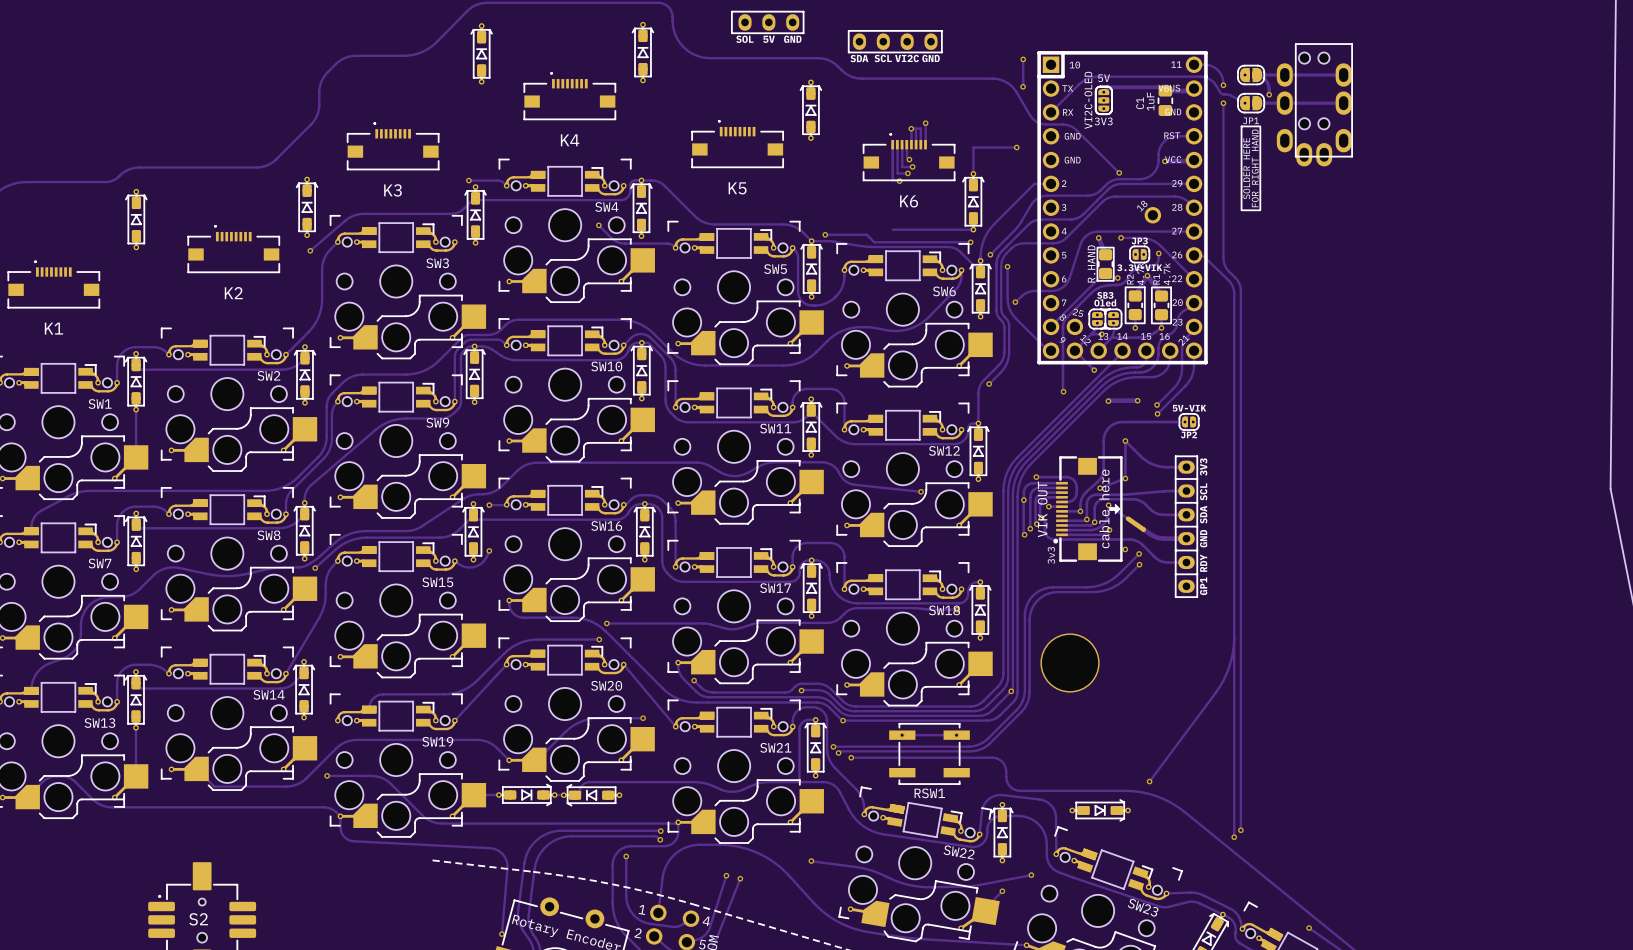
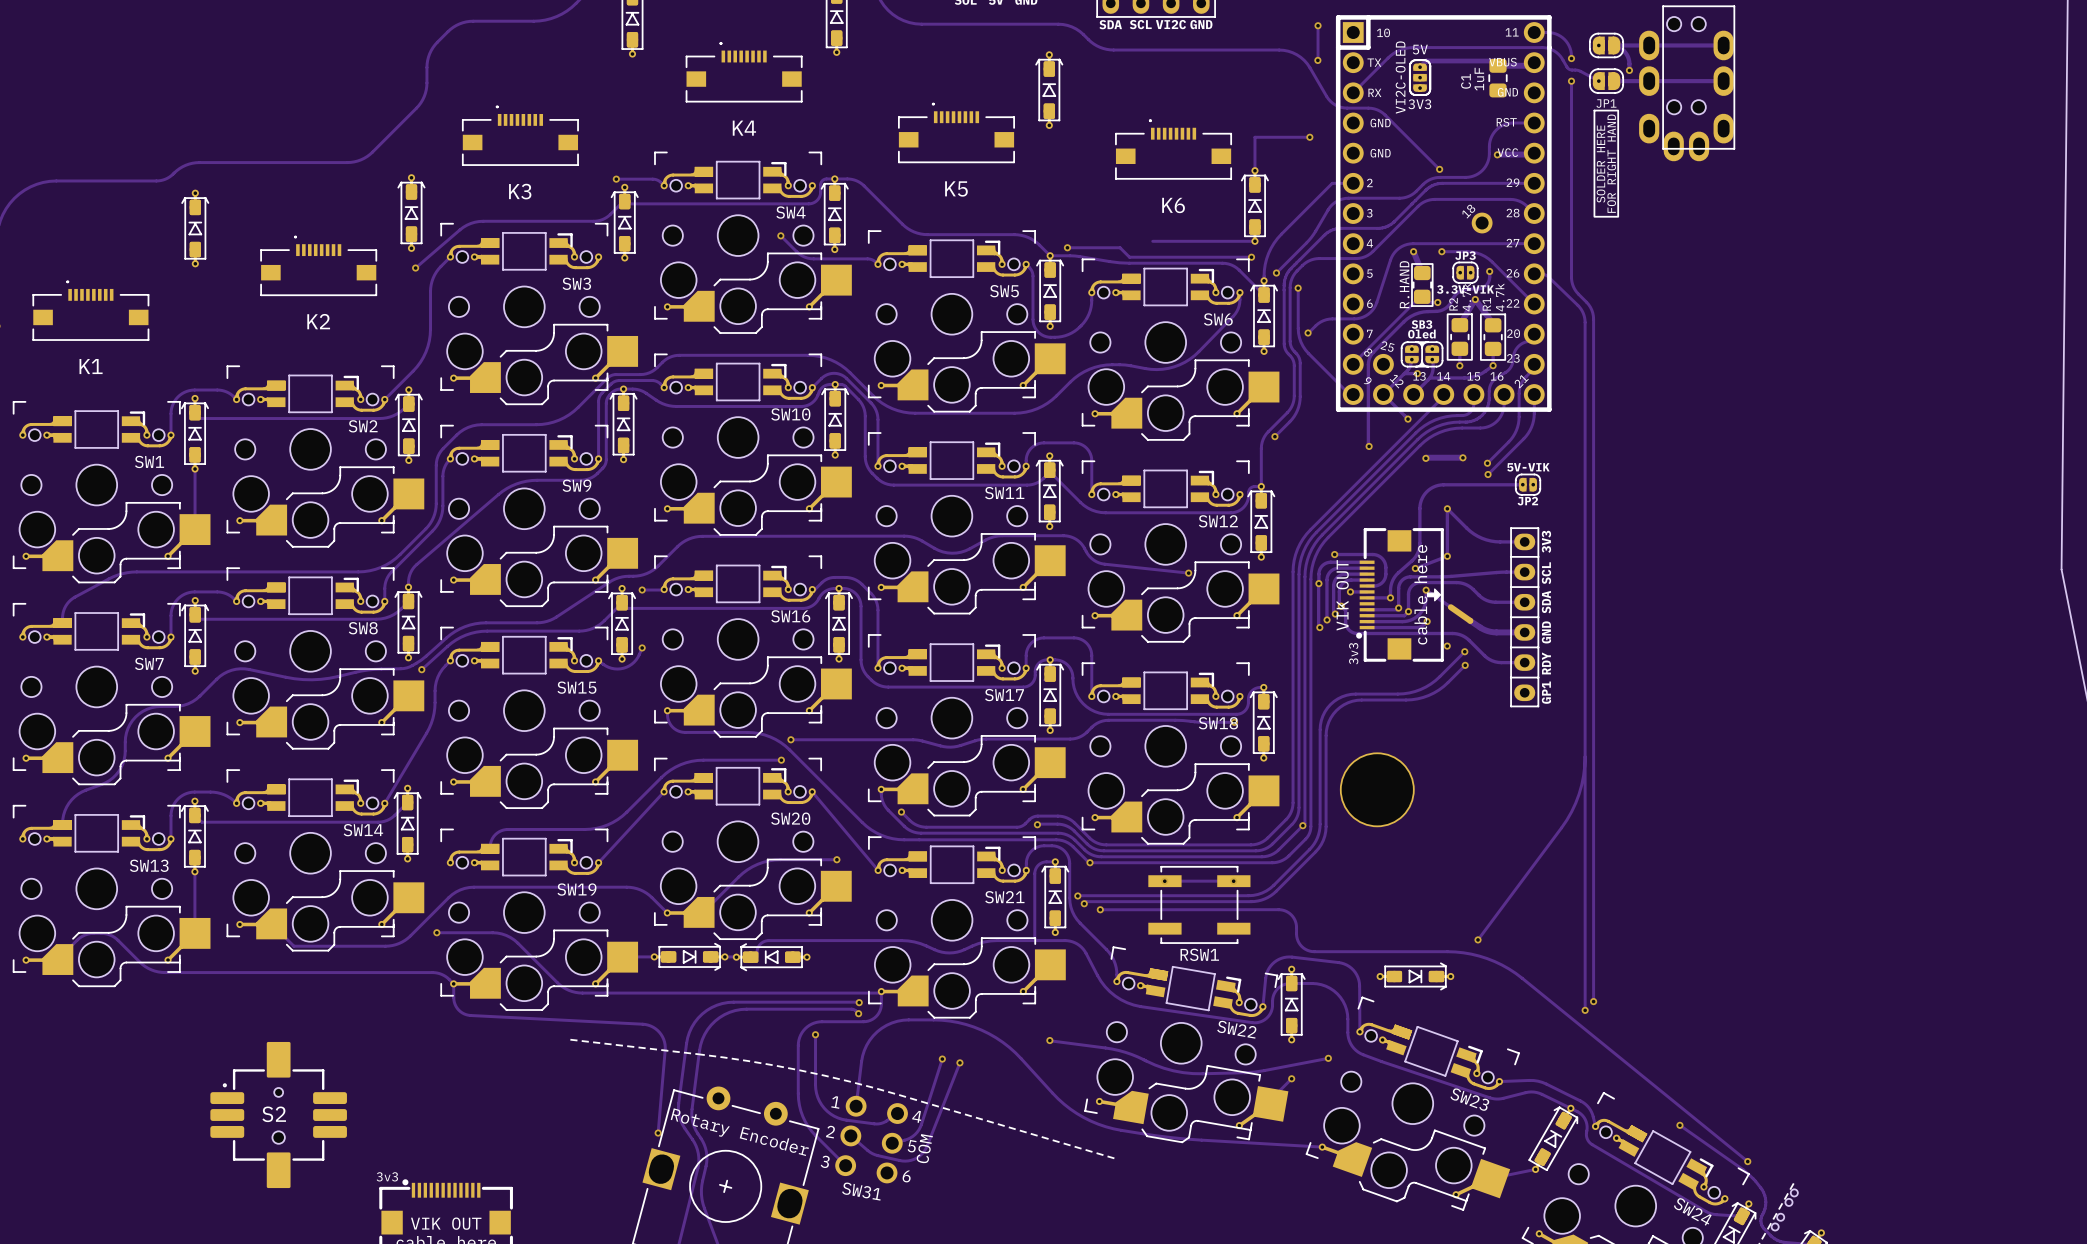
track: (925, 123) (925, 144) -> none
via: (925, 123) -> none
track: (911, 128) (911, 144) -> none
via: (911, 128) -> none
track: (897, 144) (897, 173) (907, 173) -> none
track: (902, 144) (902, 167) (912, 167) -> none
track: (906, 144) (906, 157) (909, 159) -> none
track: (915, 144) (915, 128) (920, 128) (921, 144) -> none
track: (892, 145) (892, 180) (899, 181) -> none
via: (909, 159) -> none
via: (912, 166) -> none
via: (907, 173) -> none
via: (899, 181) -> none

